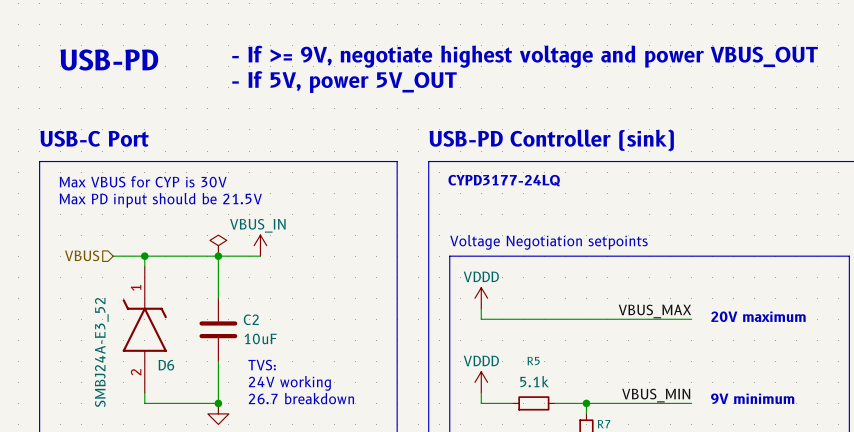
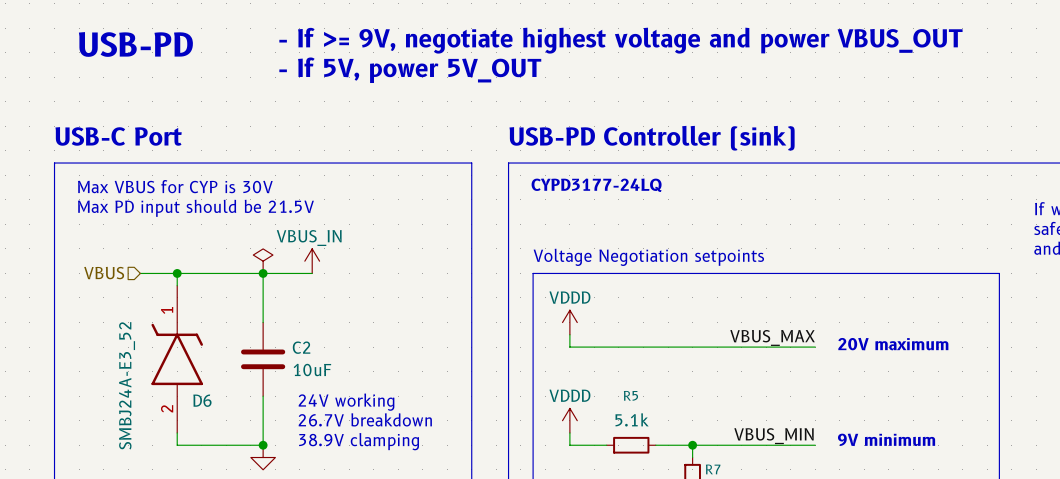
text: TVS: (262, 365) -> 24V working (346, 402)
text: 24V working (289, 383) -> 26.7V breakdown (365, 419)
text: 26.7 breakdown (301, 398) -> 38.9V clamping (359, 441)

